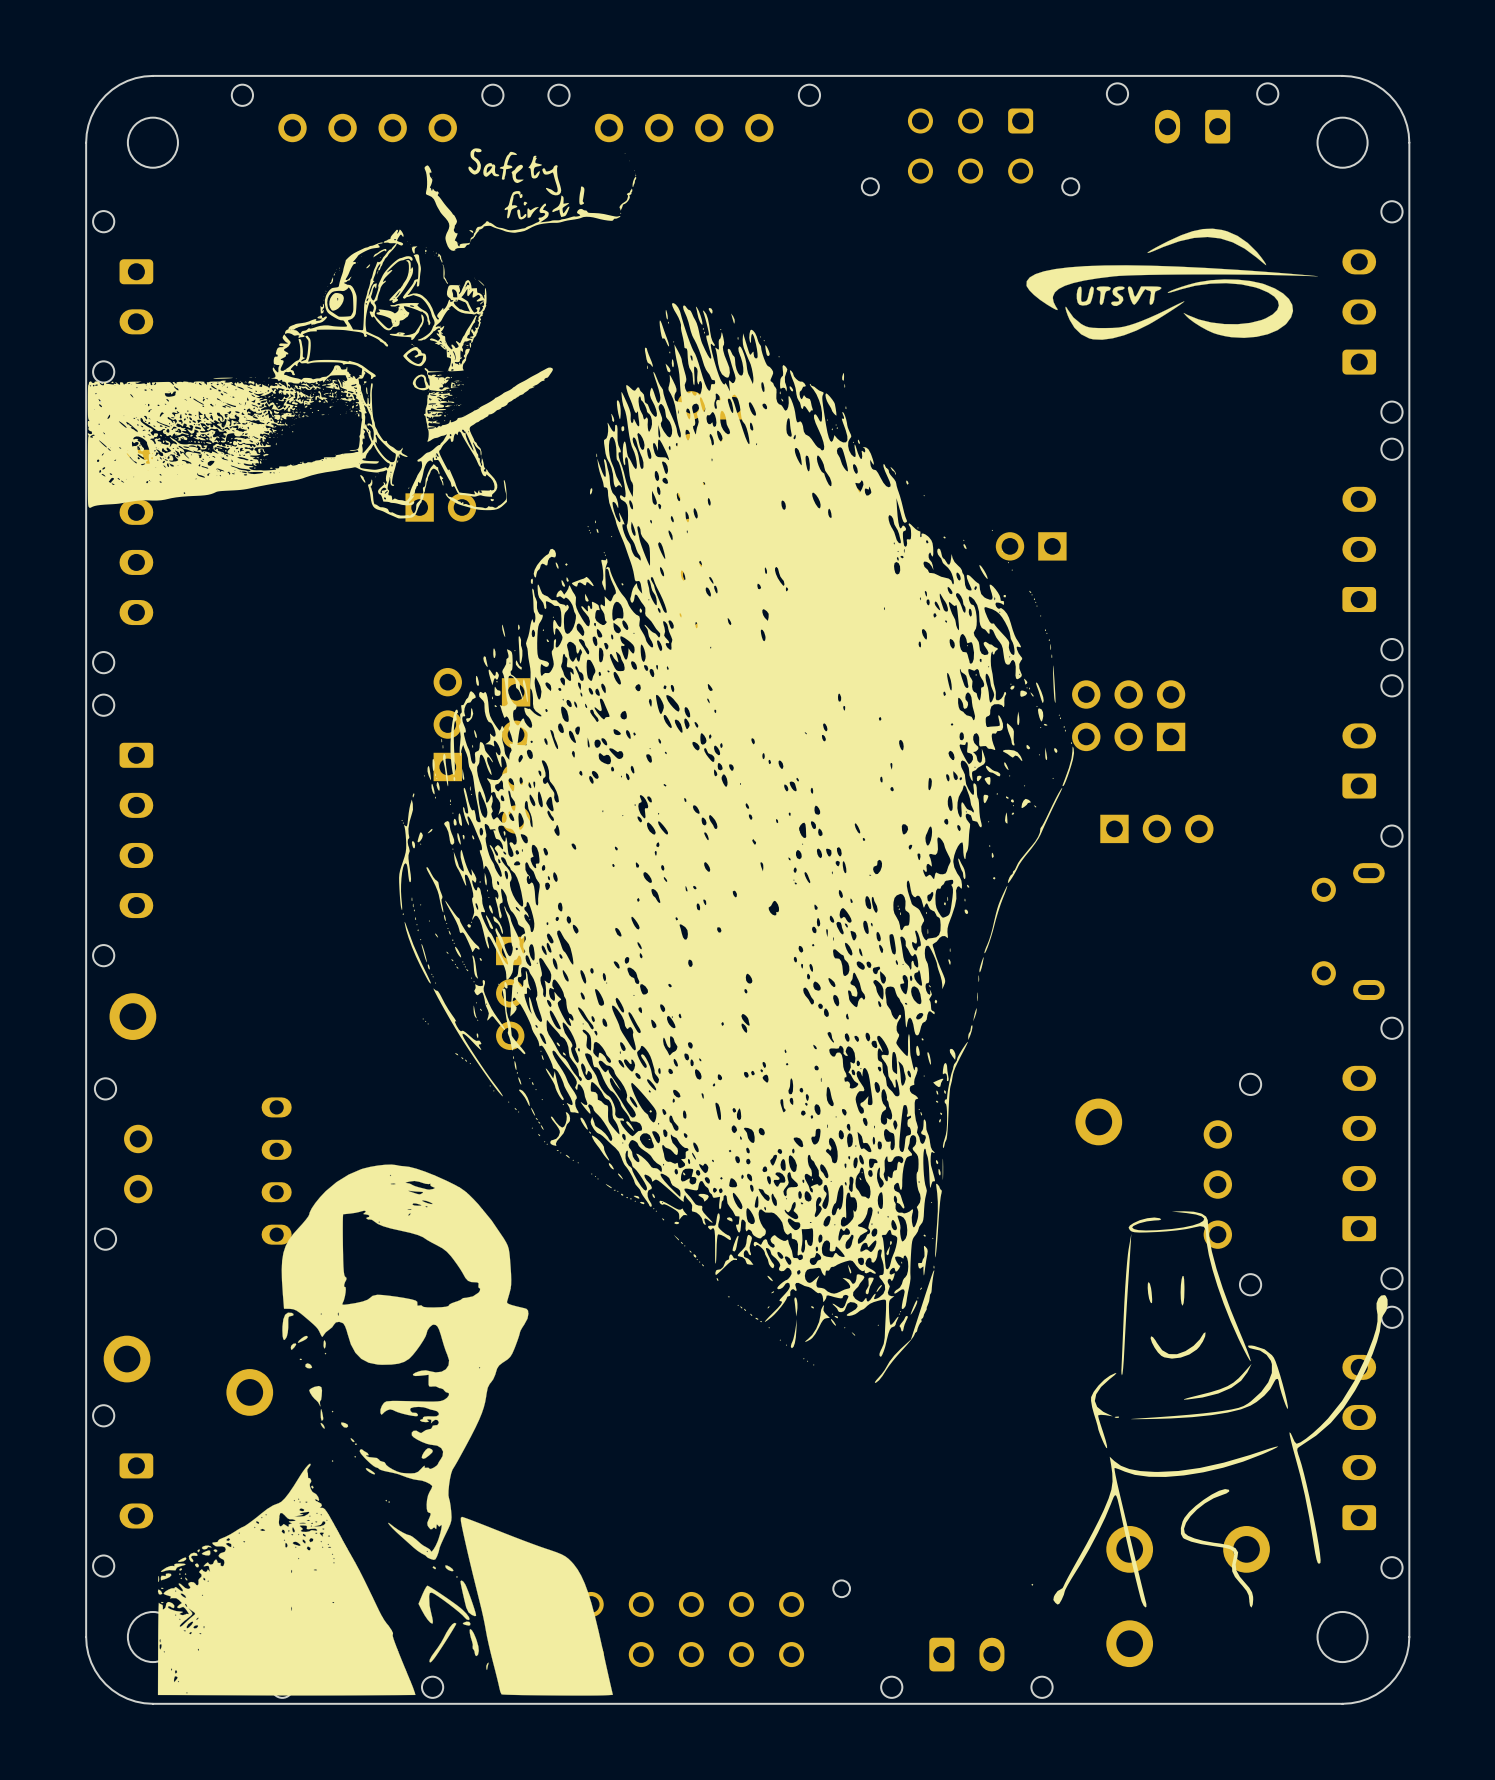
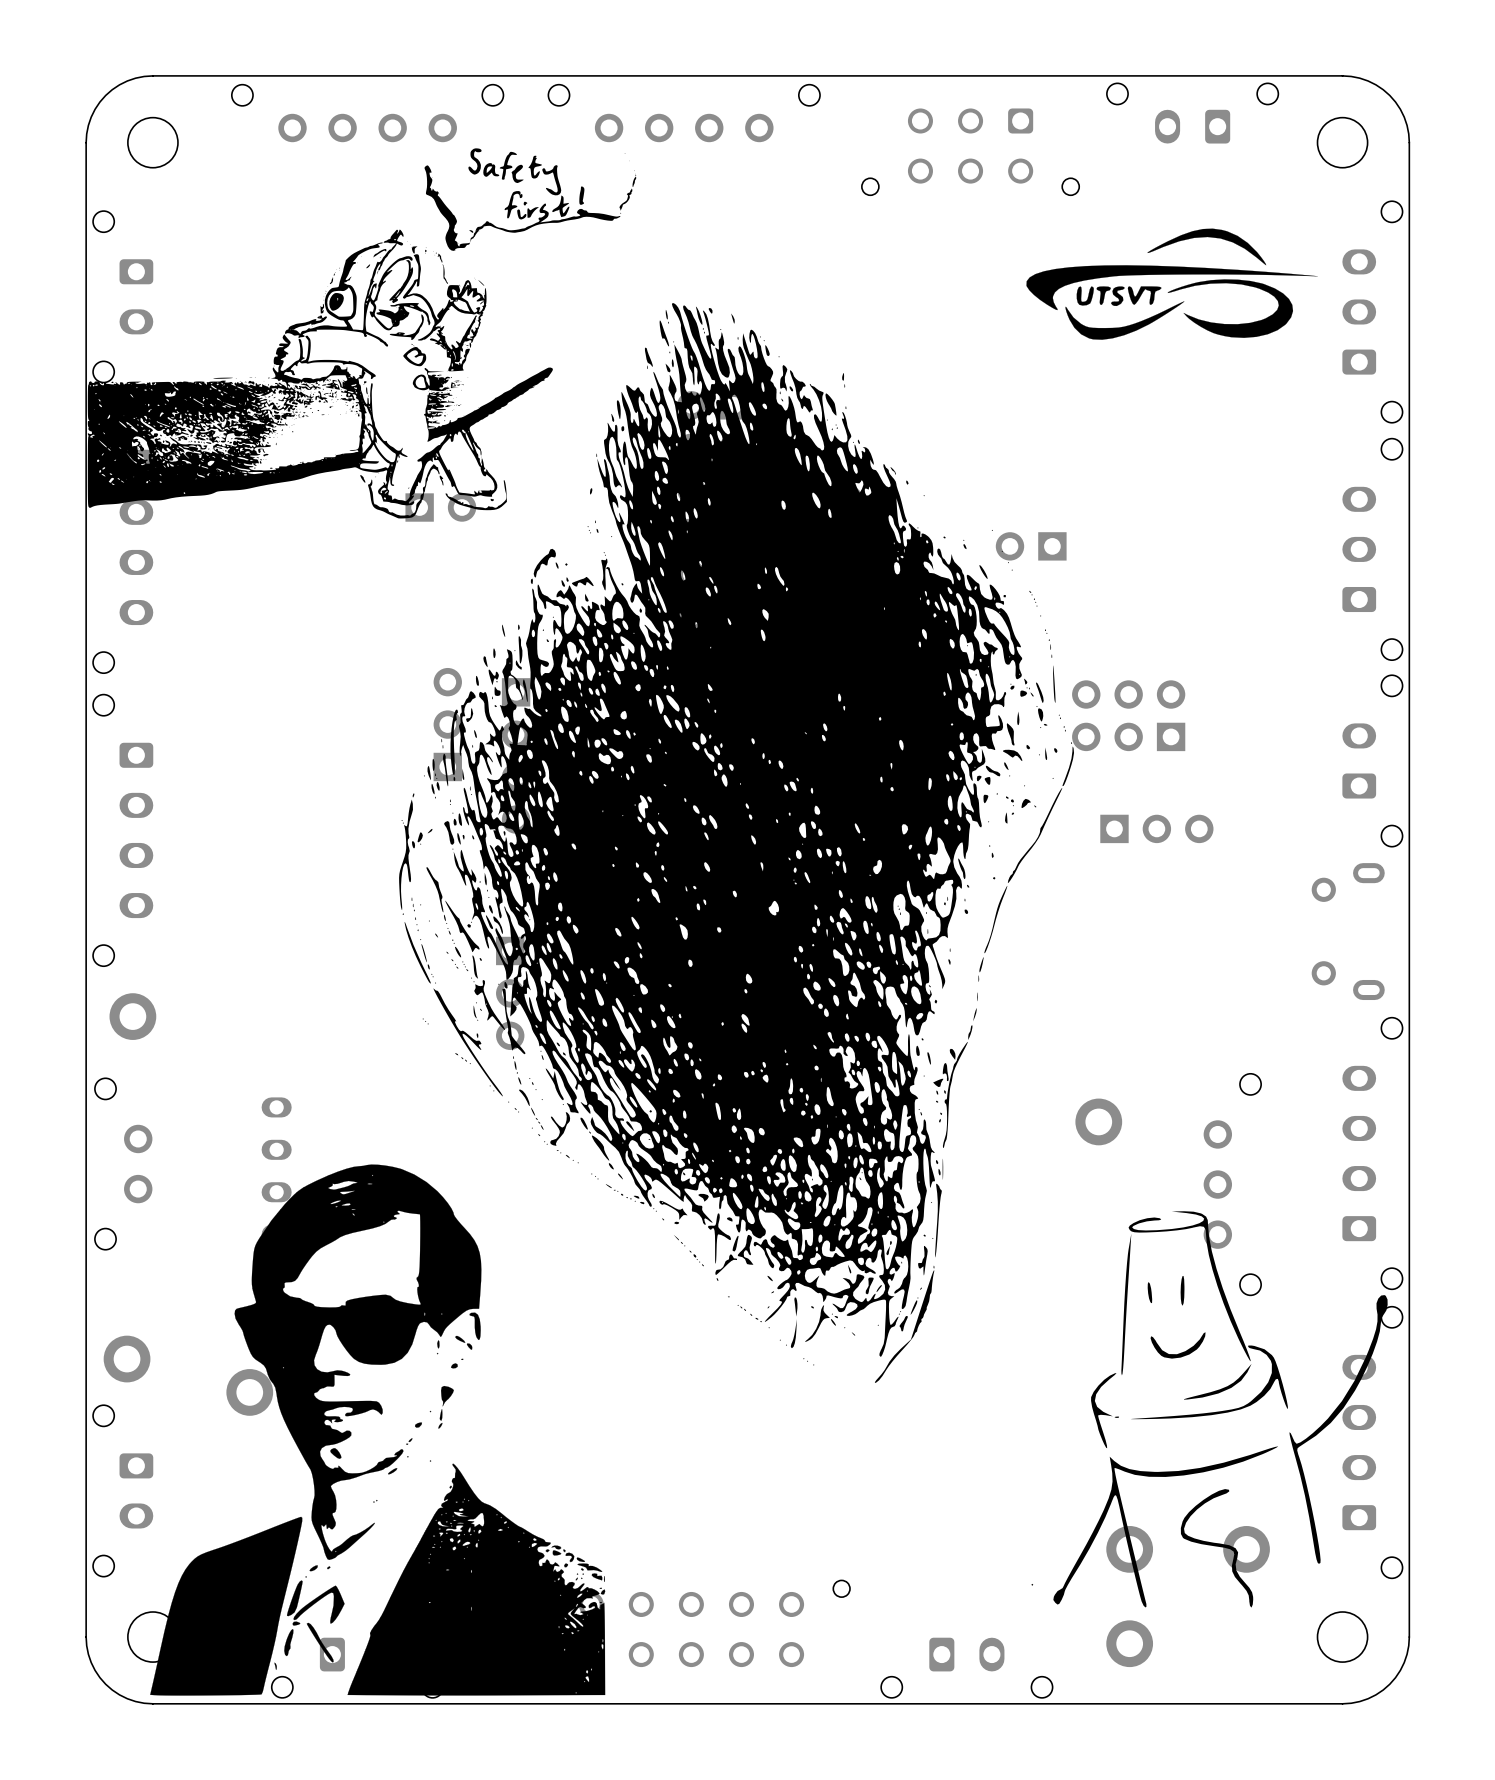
drawing: none -> [399, 303, 1075, 1383]
part: (736, 843) -> none
drawing shape: [157, 1164, 613, 1696] -> [150, 1164, 606, 1696]

